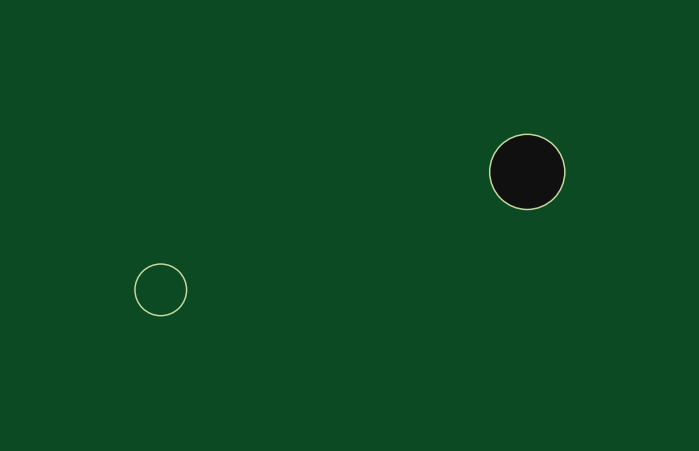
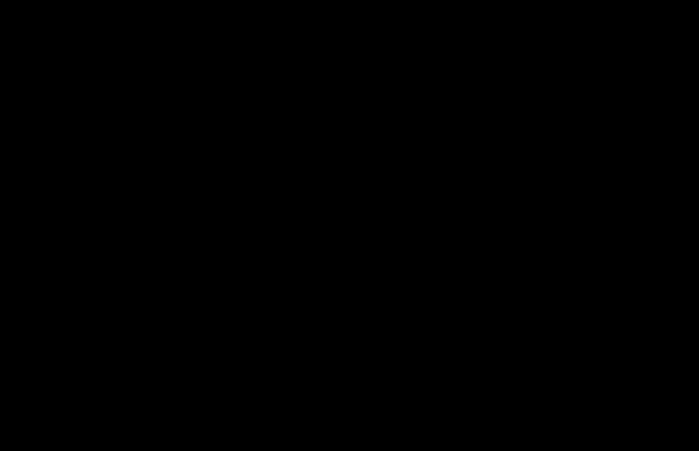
part: (527, 171) -> none
round board edge: [134, 263, 188, 317] -> none

